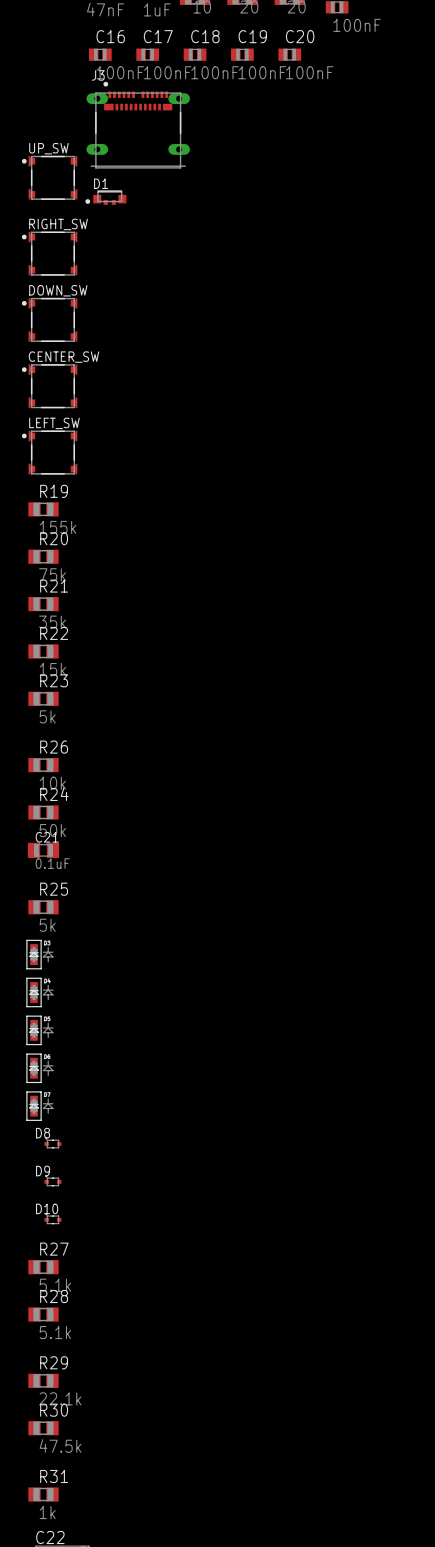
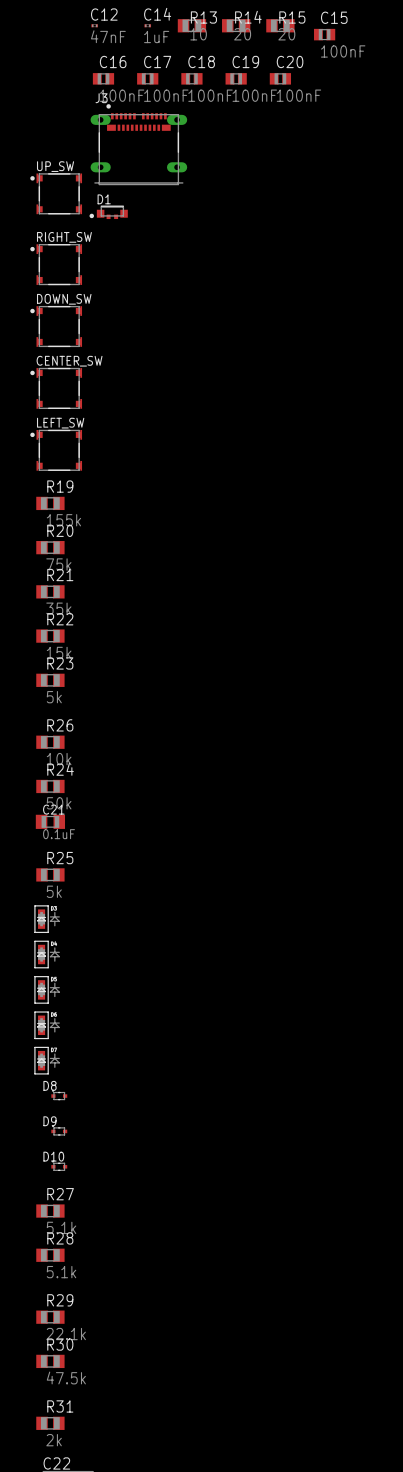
R31 value: 1k (47, 1512) -> 2k (54, 1440)

